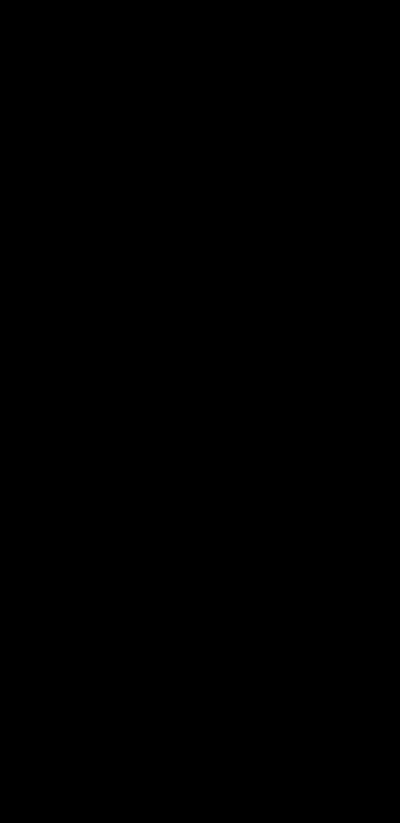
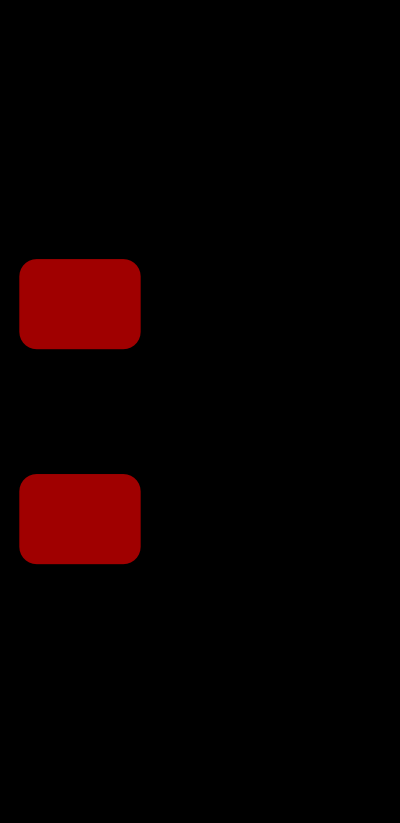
part: none -> (79, 411)

